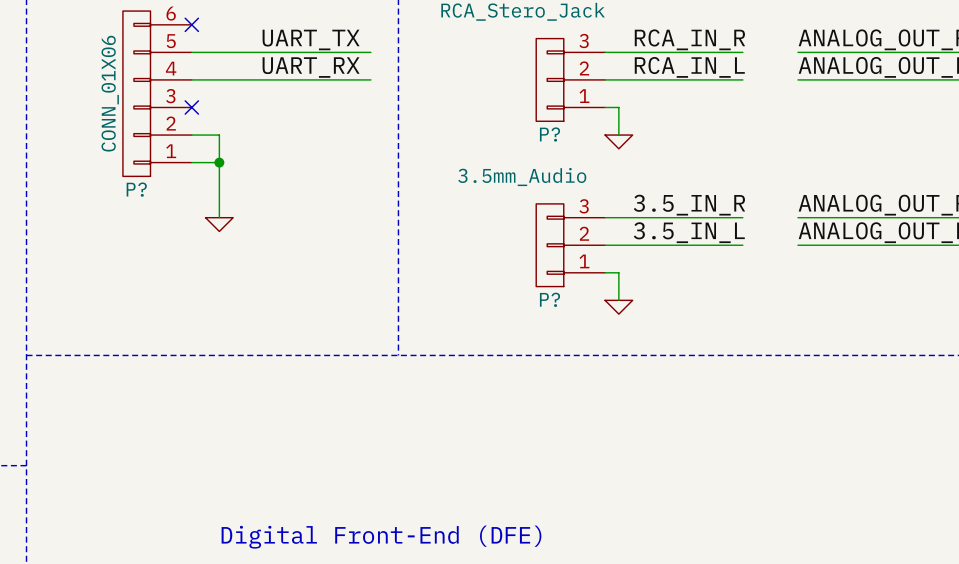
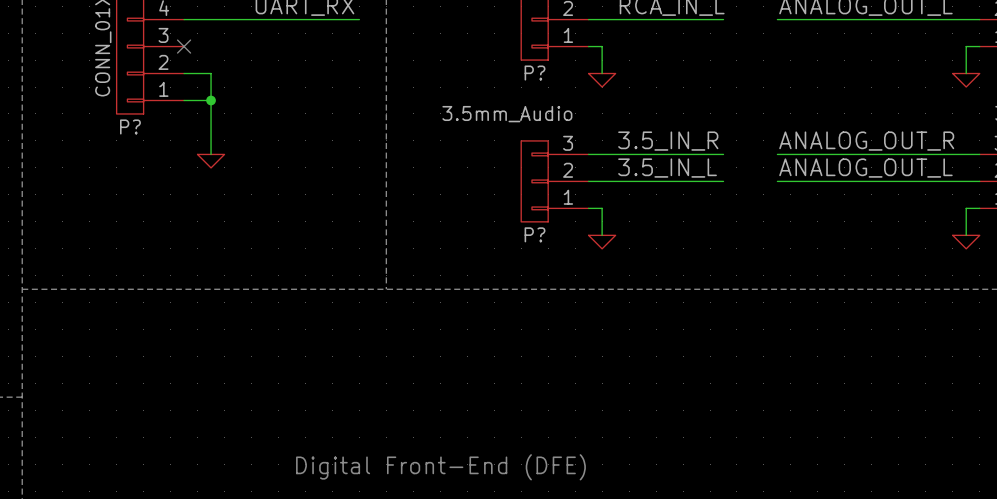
text position: Digital Front-End (DFE) (381, 537) -> Digital Front-End (DFE) (440, 467)

